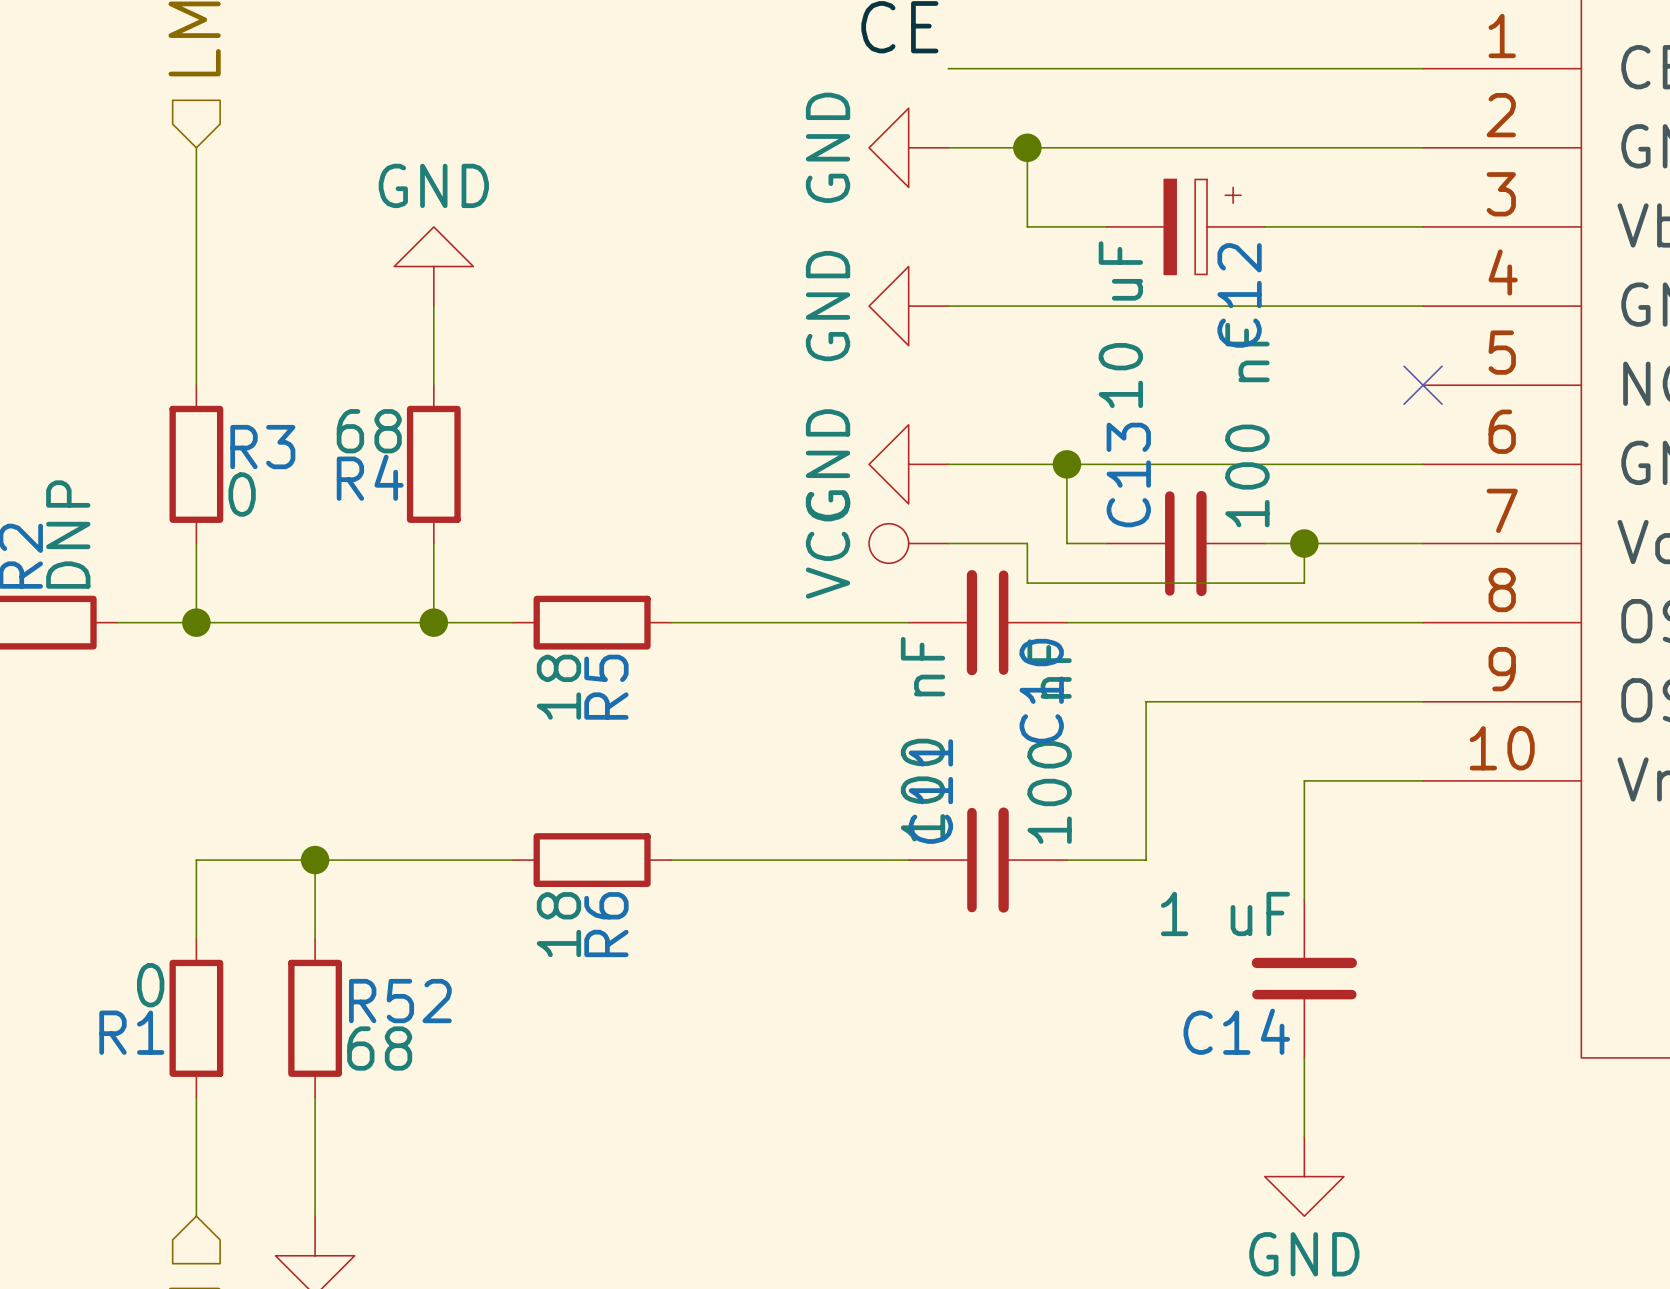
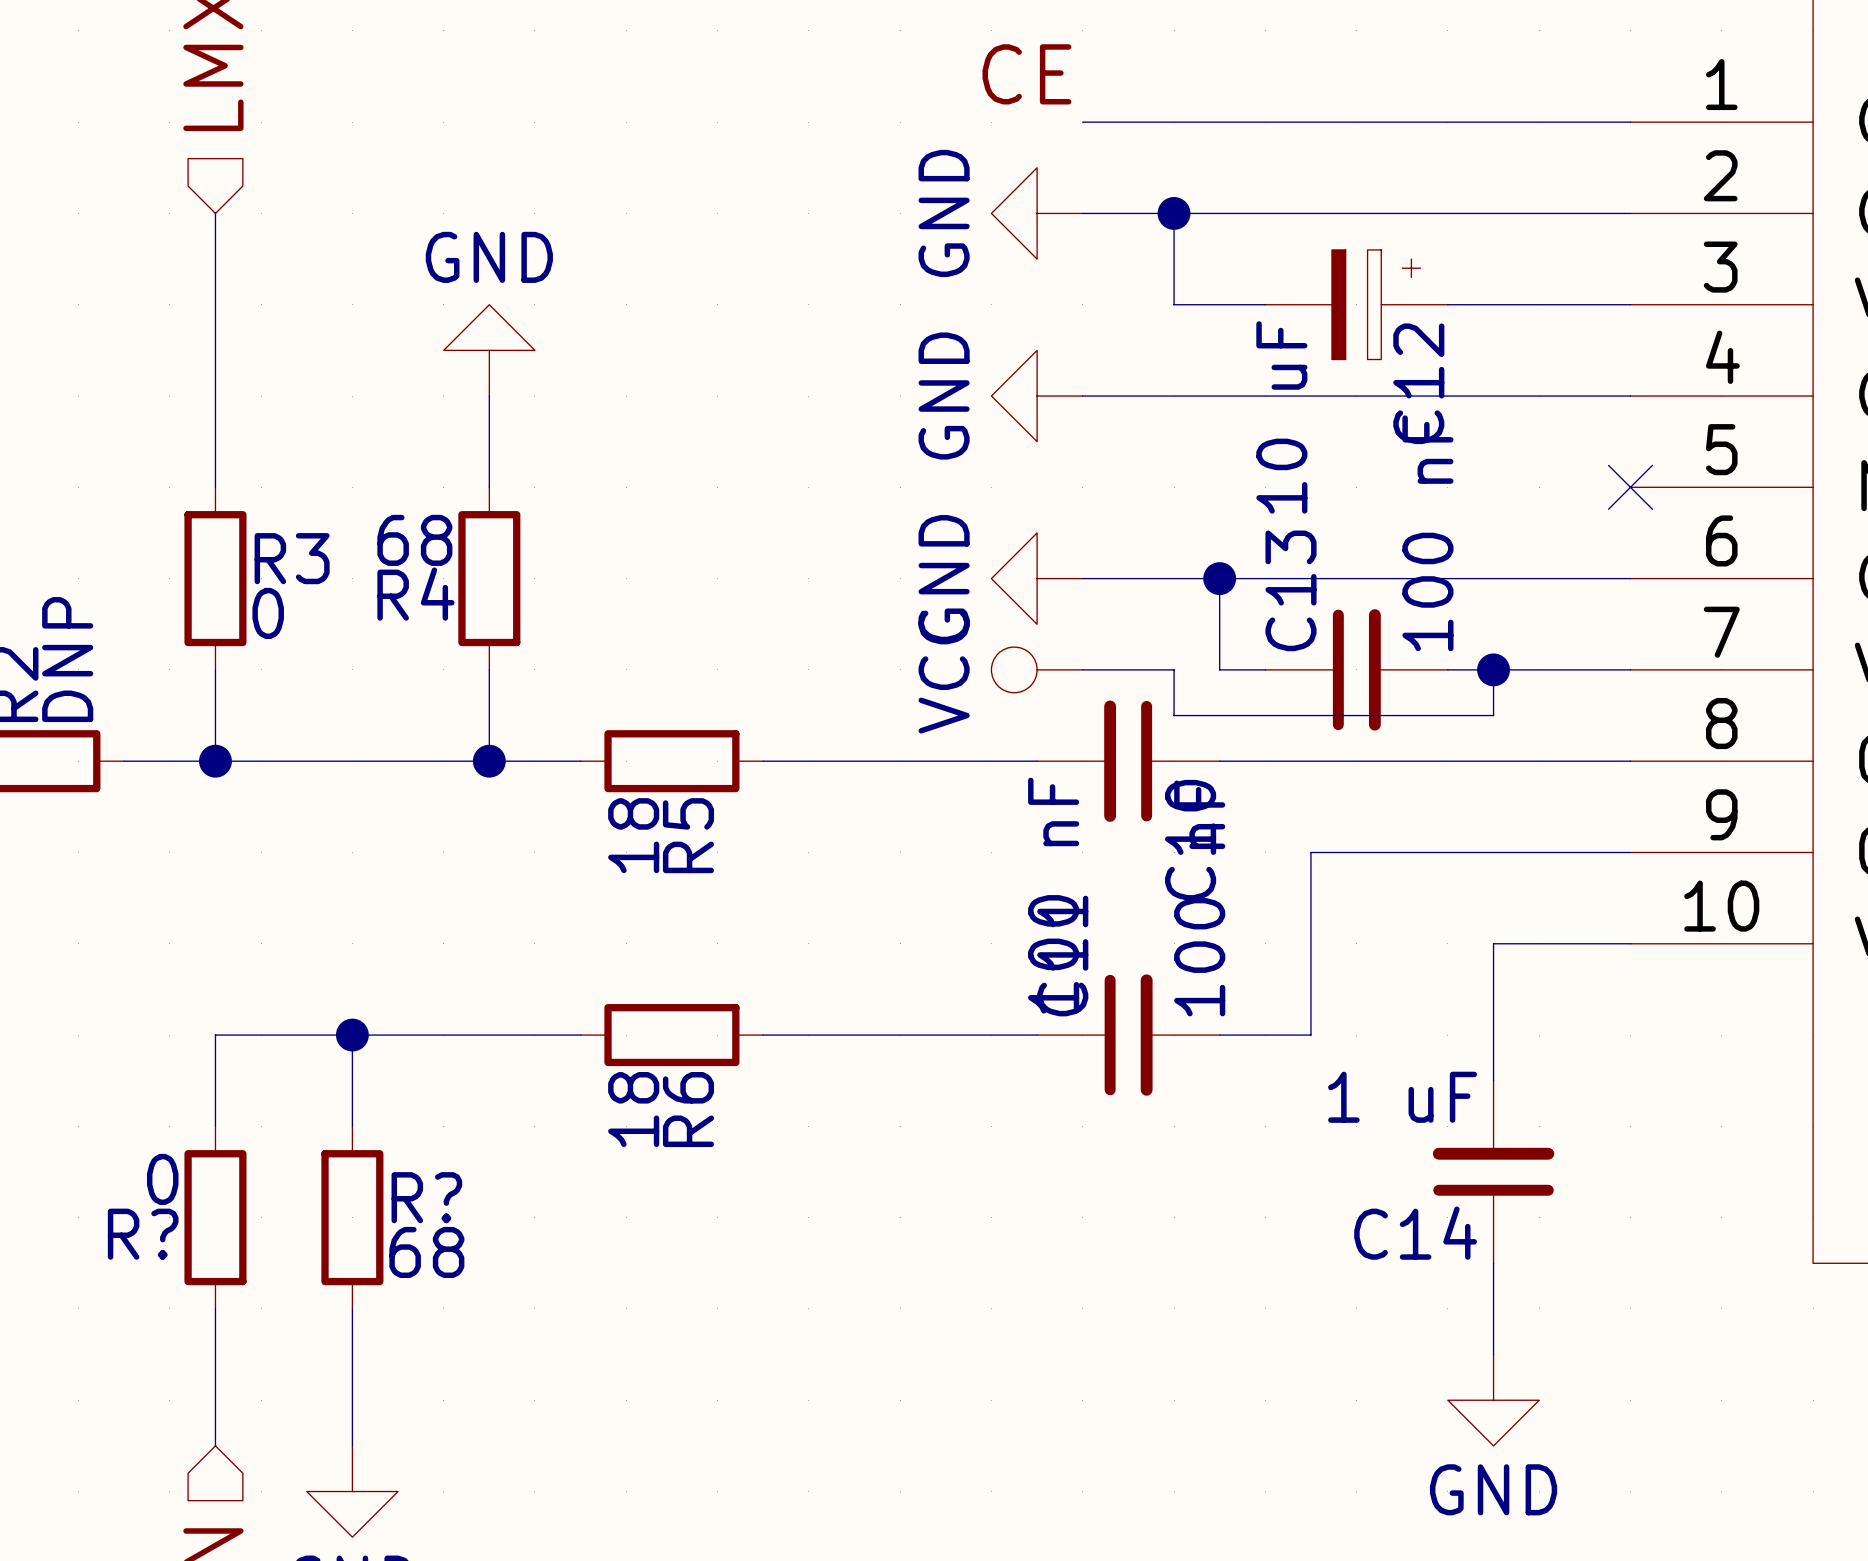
R52 name: R52 (400, 1001) -> R? (426, 1197)
R1 name: R1 (131, 1032) -> R? (143, 1234)

